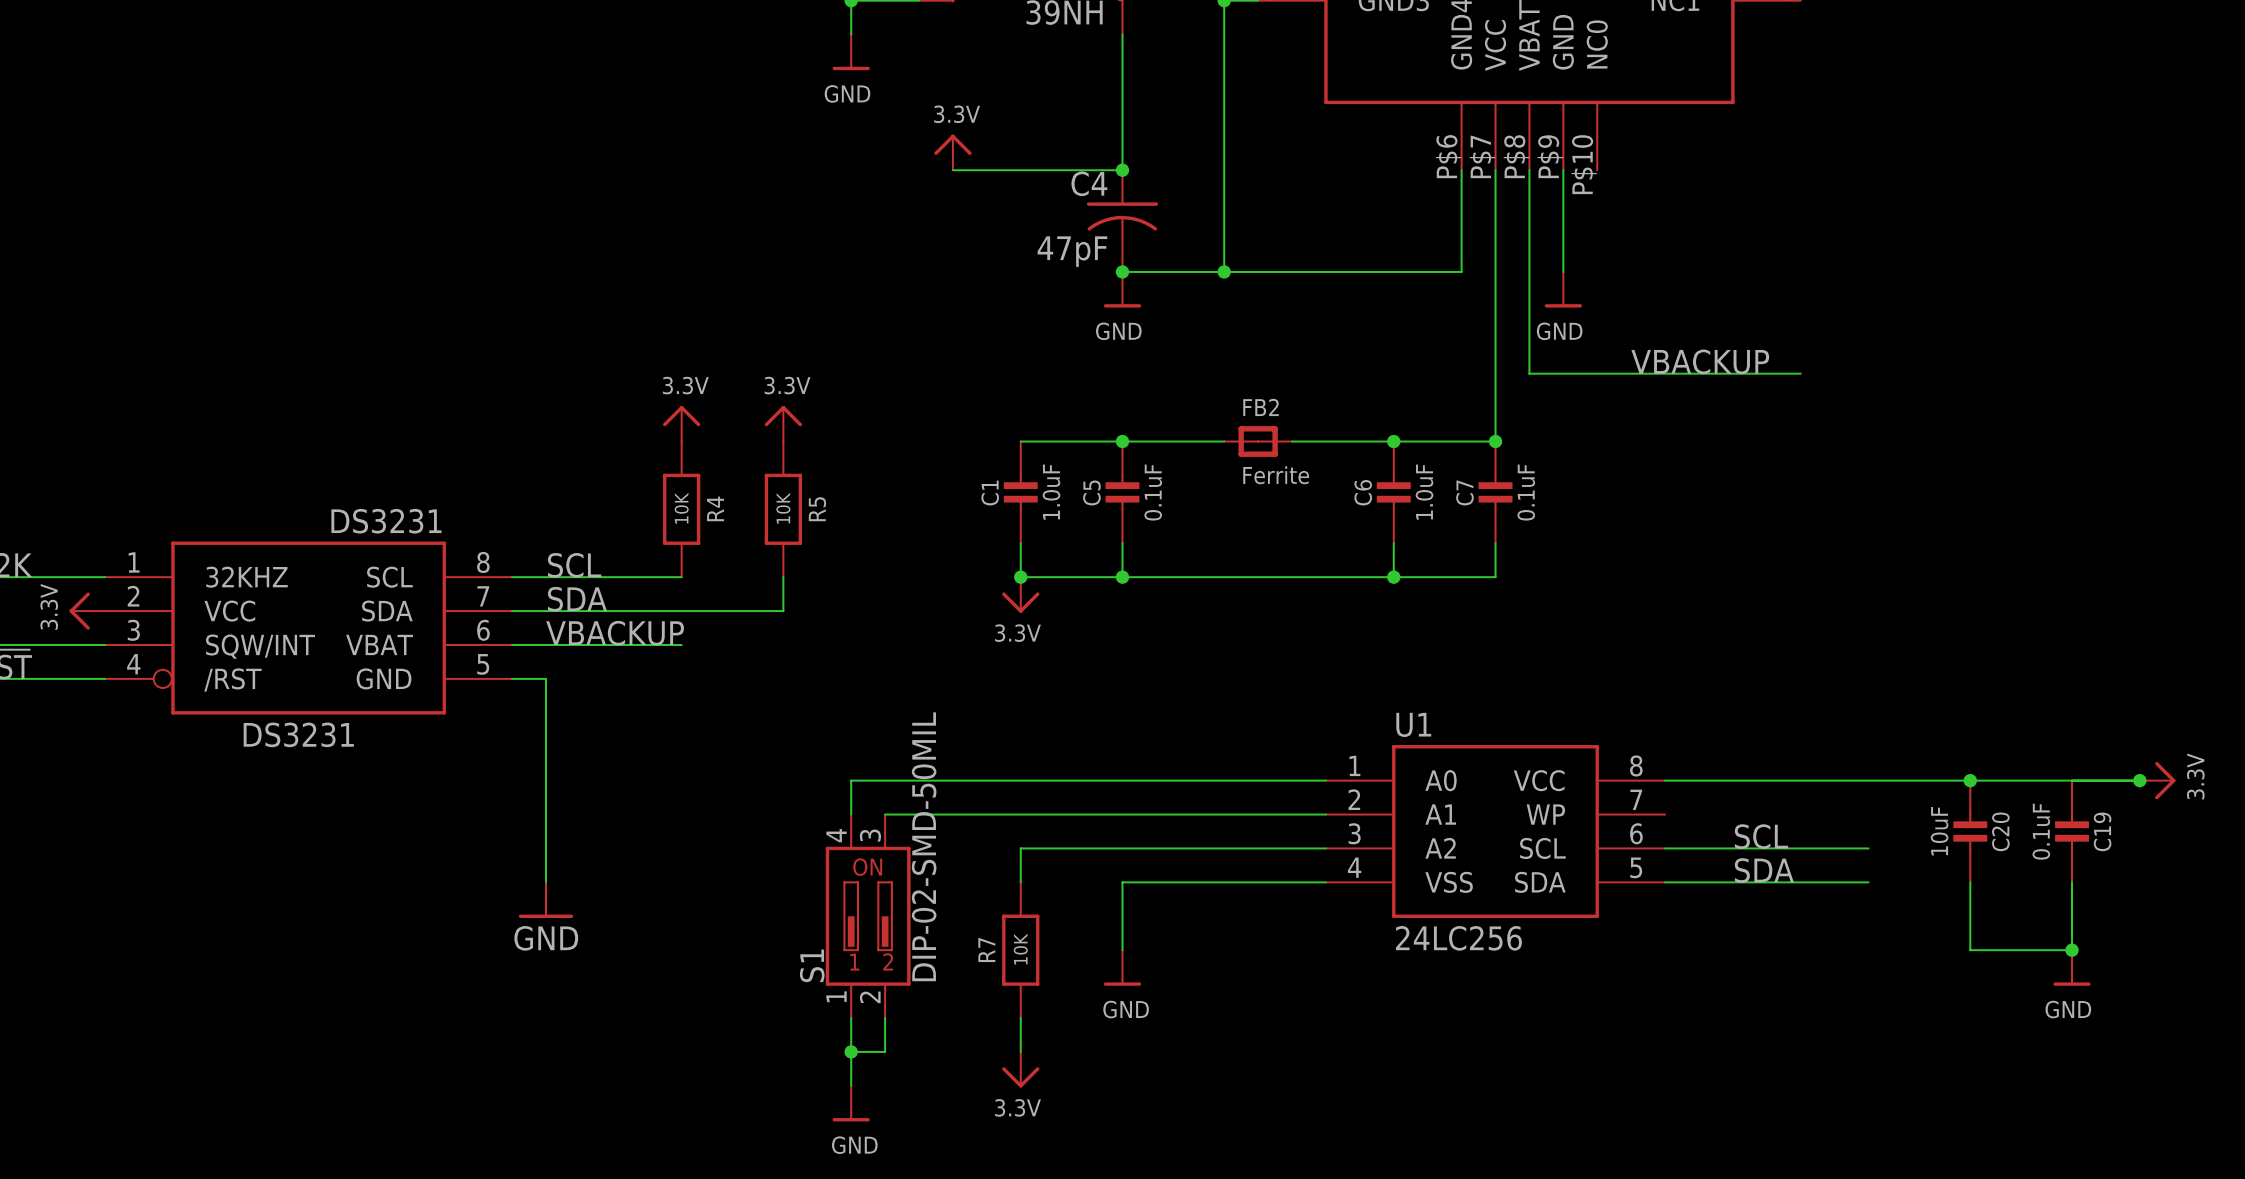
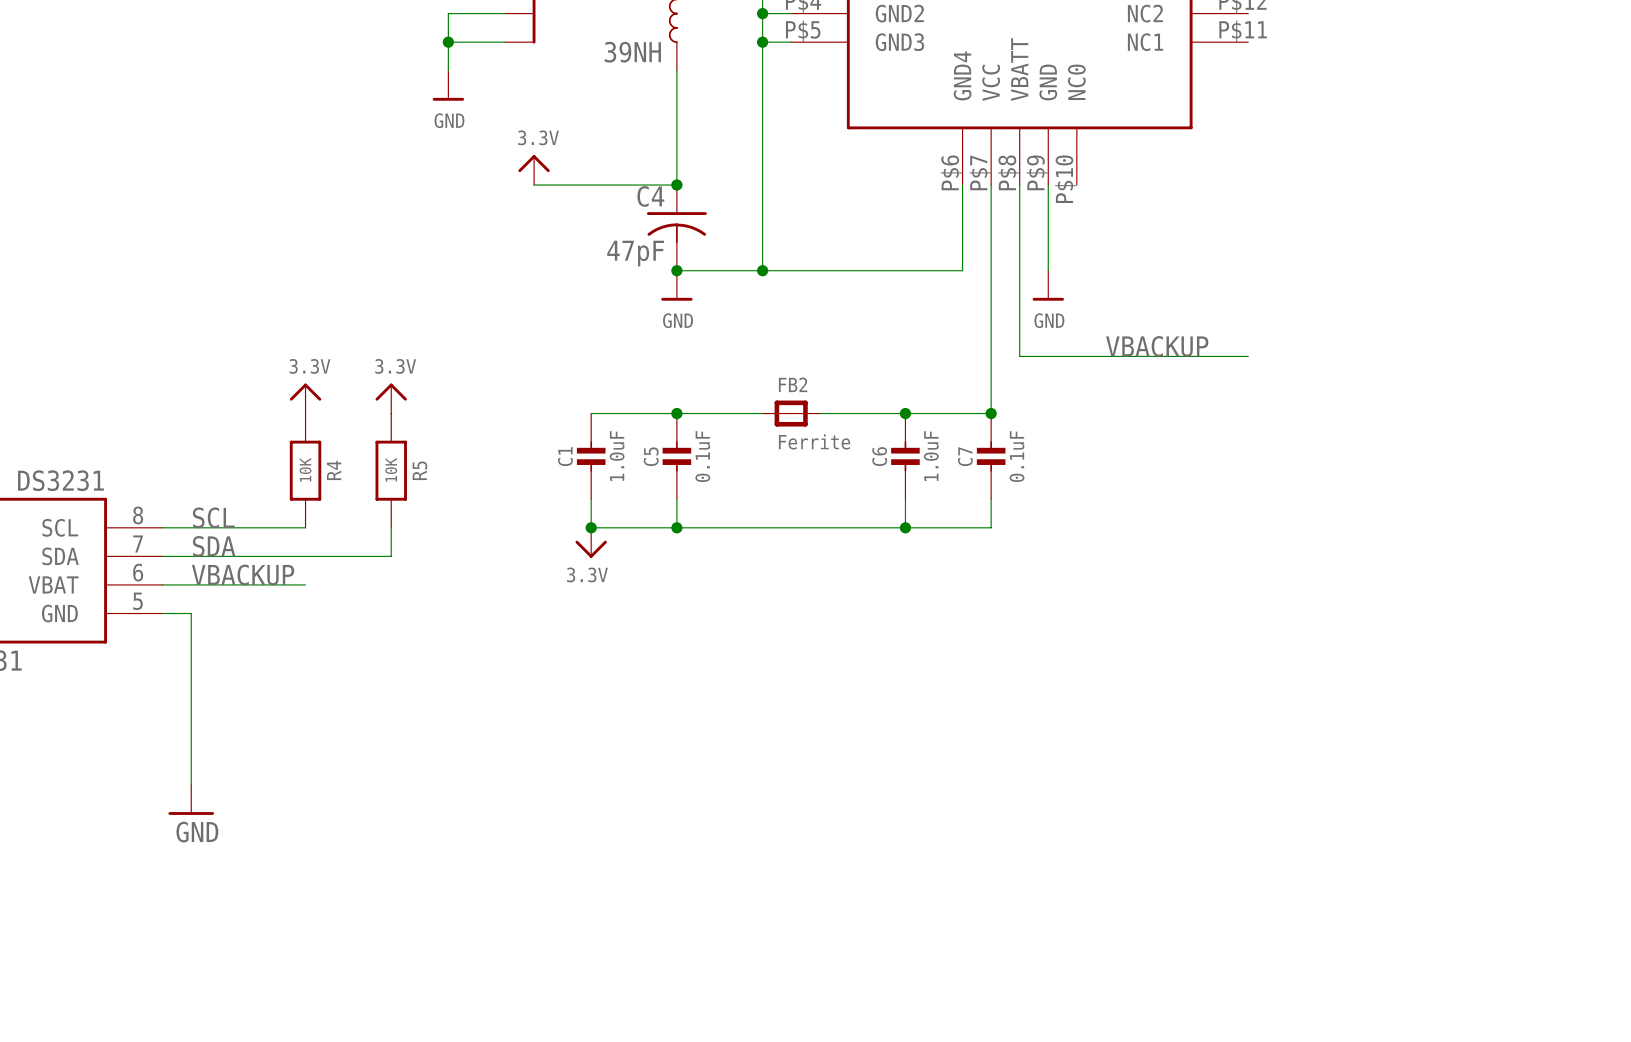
wire: (1325, 780) (851, 780) (851, 814) -> none
wire: (1665, 780) (2139, 780) -> none
junction: (1970, 780) -> none
junction: (2139, 780) -> none
power symbol: 3.3V (2157, 780) -> none
wire: (885, 814) (1325, 814) -> none
U1: 24LC256 (1495, 831) -> none
C20: 10uF (1970, 831) -> none
C19: 0.1uF (2072, 831) -> none
label: SCL (1761, 836) -> none
wire: (1325, 848) (1020, 848) (1020, 882) -> none
wire: (1665, 848) (1868, 848) -> none
label: SDA (1764, 870) -> none
wire: (1325, 882) (1122, 882) (1122, 950) -> none
wire: (1665, 882) (1868, 882) -> none
wire: (1970, 882) (1970, 950) (2072, 950) (2072, 882) -> none
S1: DIP-02-SMD-50MIL (868, 916) -> none
R7: 10K (1020, 950) -> none
junction: (2072, 950) -> none
power symbol: GND (1122, 967) -> none
power symbol: GND (2072, 967) -> none
wire: (851, 1018) (851, 1085) -> none
wire: (885, 1018) (885, 1051) (851, 1051) -> none
wire: (1020, 1018) (1020, 1051) -> none
junction: (851, 1051) -> none
power symbol: 3.3V (1020, 1069) -> none
power symbol: GND (851, 1103) -> none

